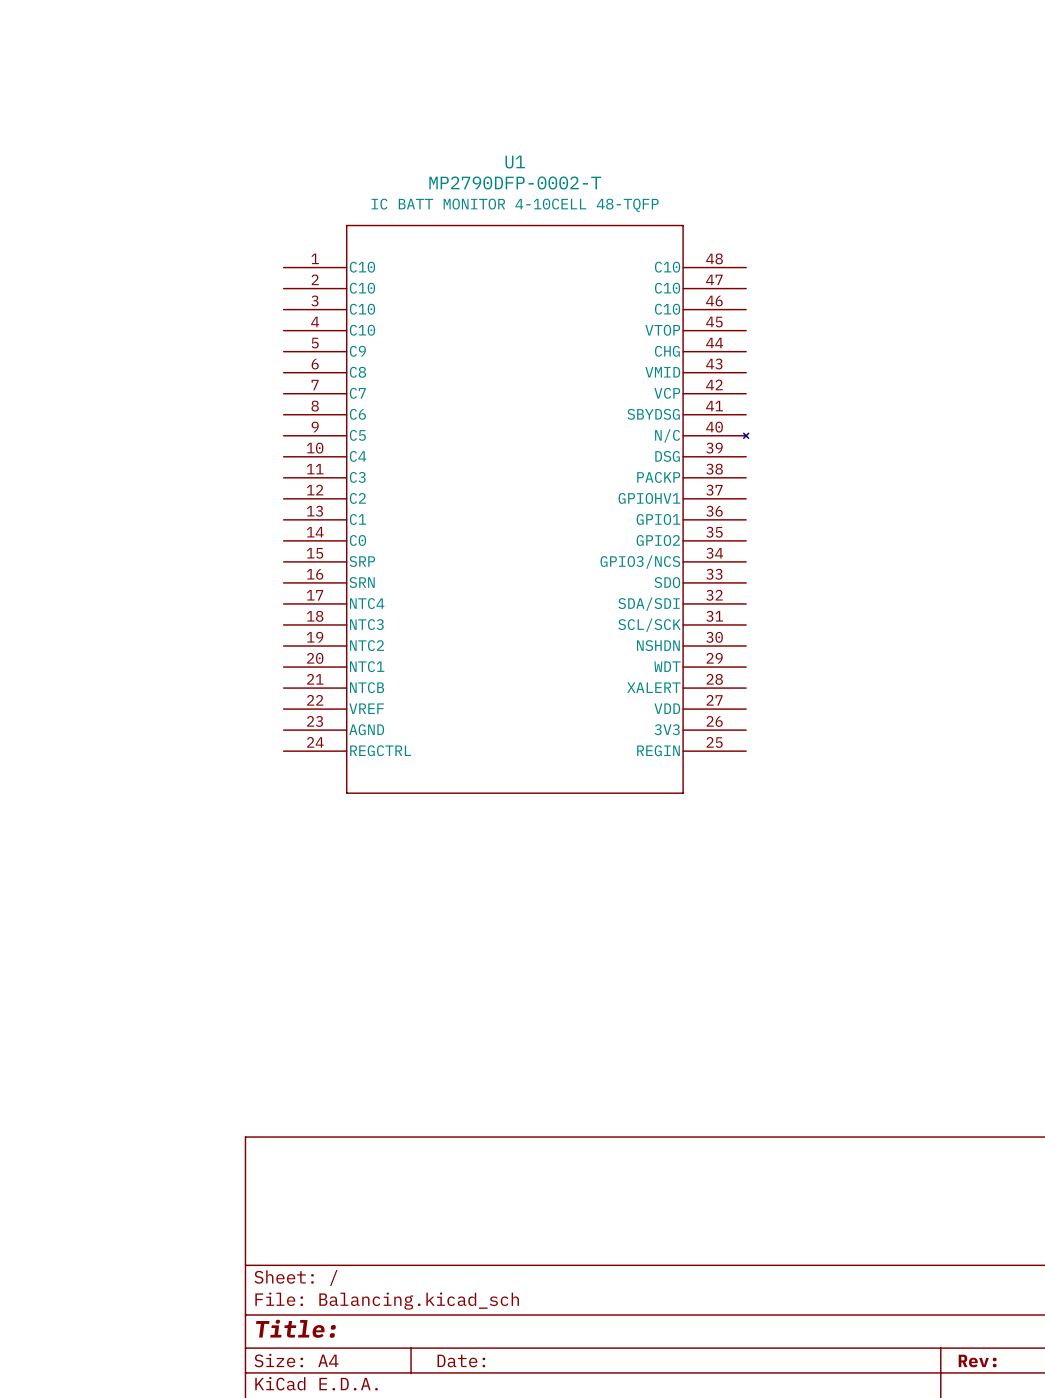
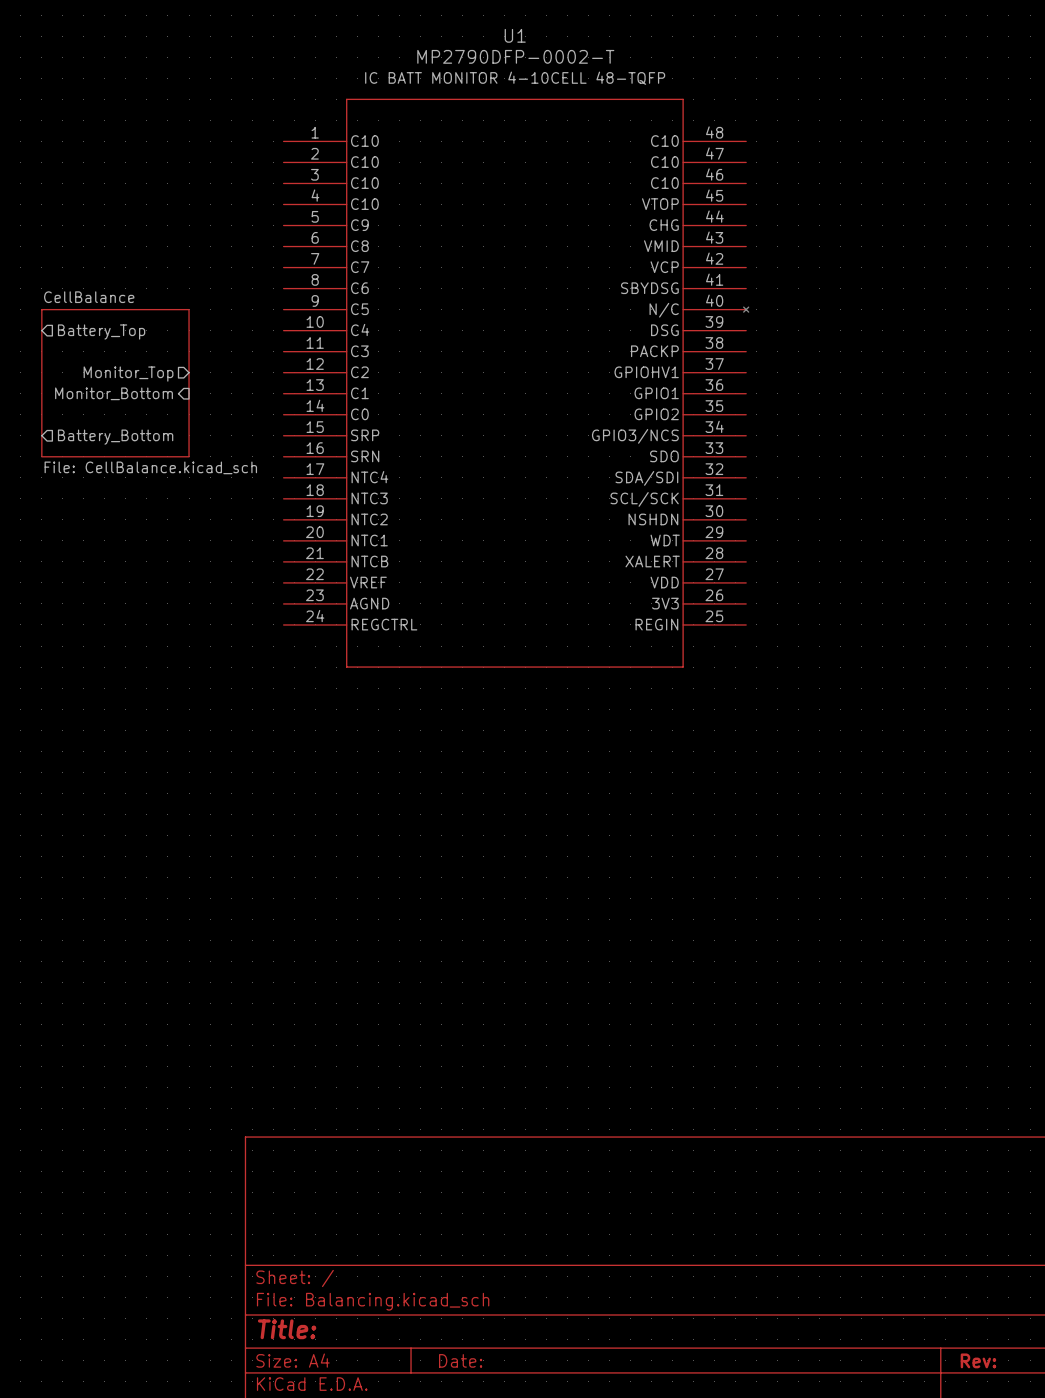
sheet pin: none -> Battery_Top (101, 332)
sheet pin: none -> Monitor_Top (128, 374)
sheet CellBalance: none -> File: CellBalance.kicad_sch (115, 383)
sheet pin: none -> Monitor_Bottom (114, 393)
sheet pin: none -> Battery_Bottom (115, 437)
U1 position: (516, 509) -> (516, 383)

